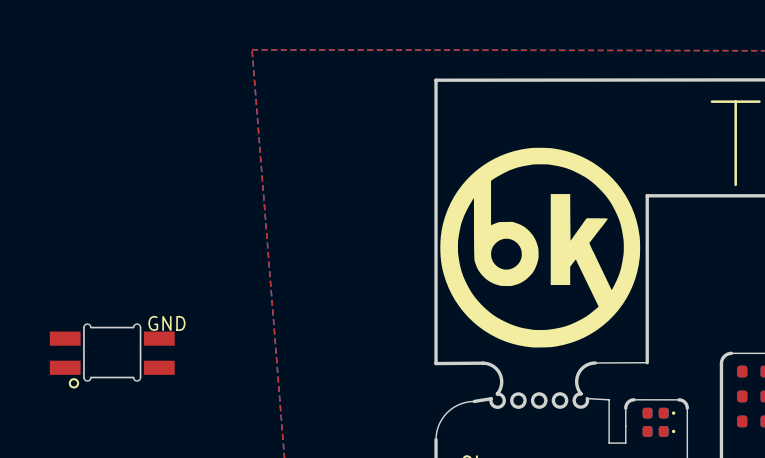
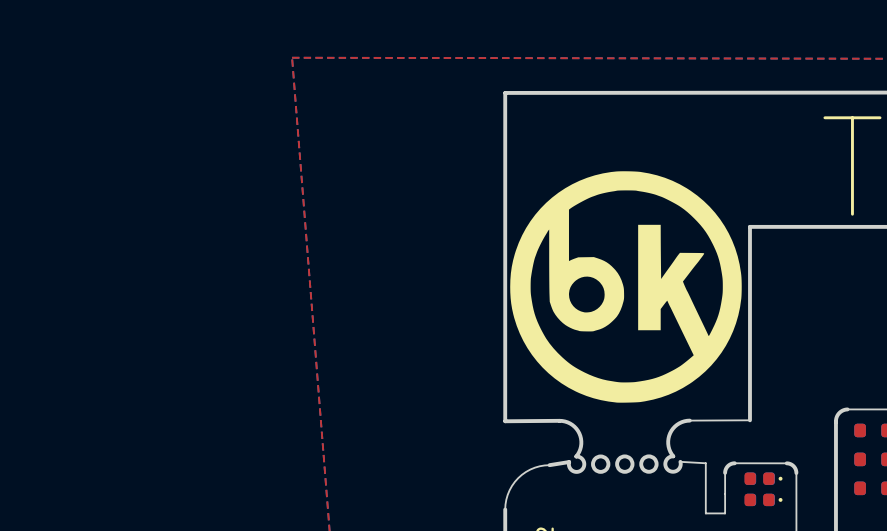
part: (112, 356) -> none

